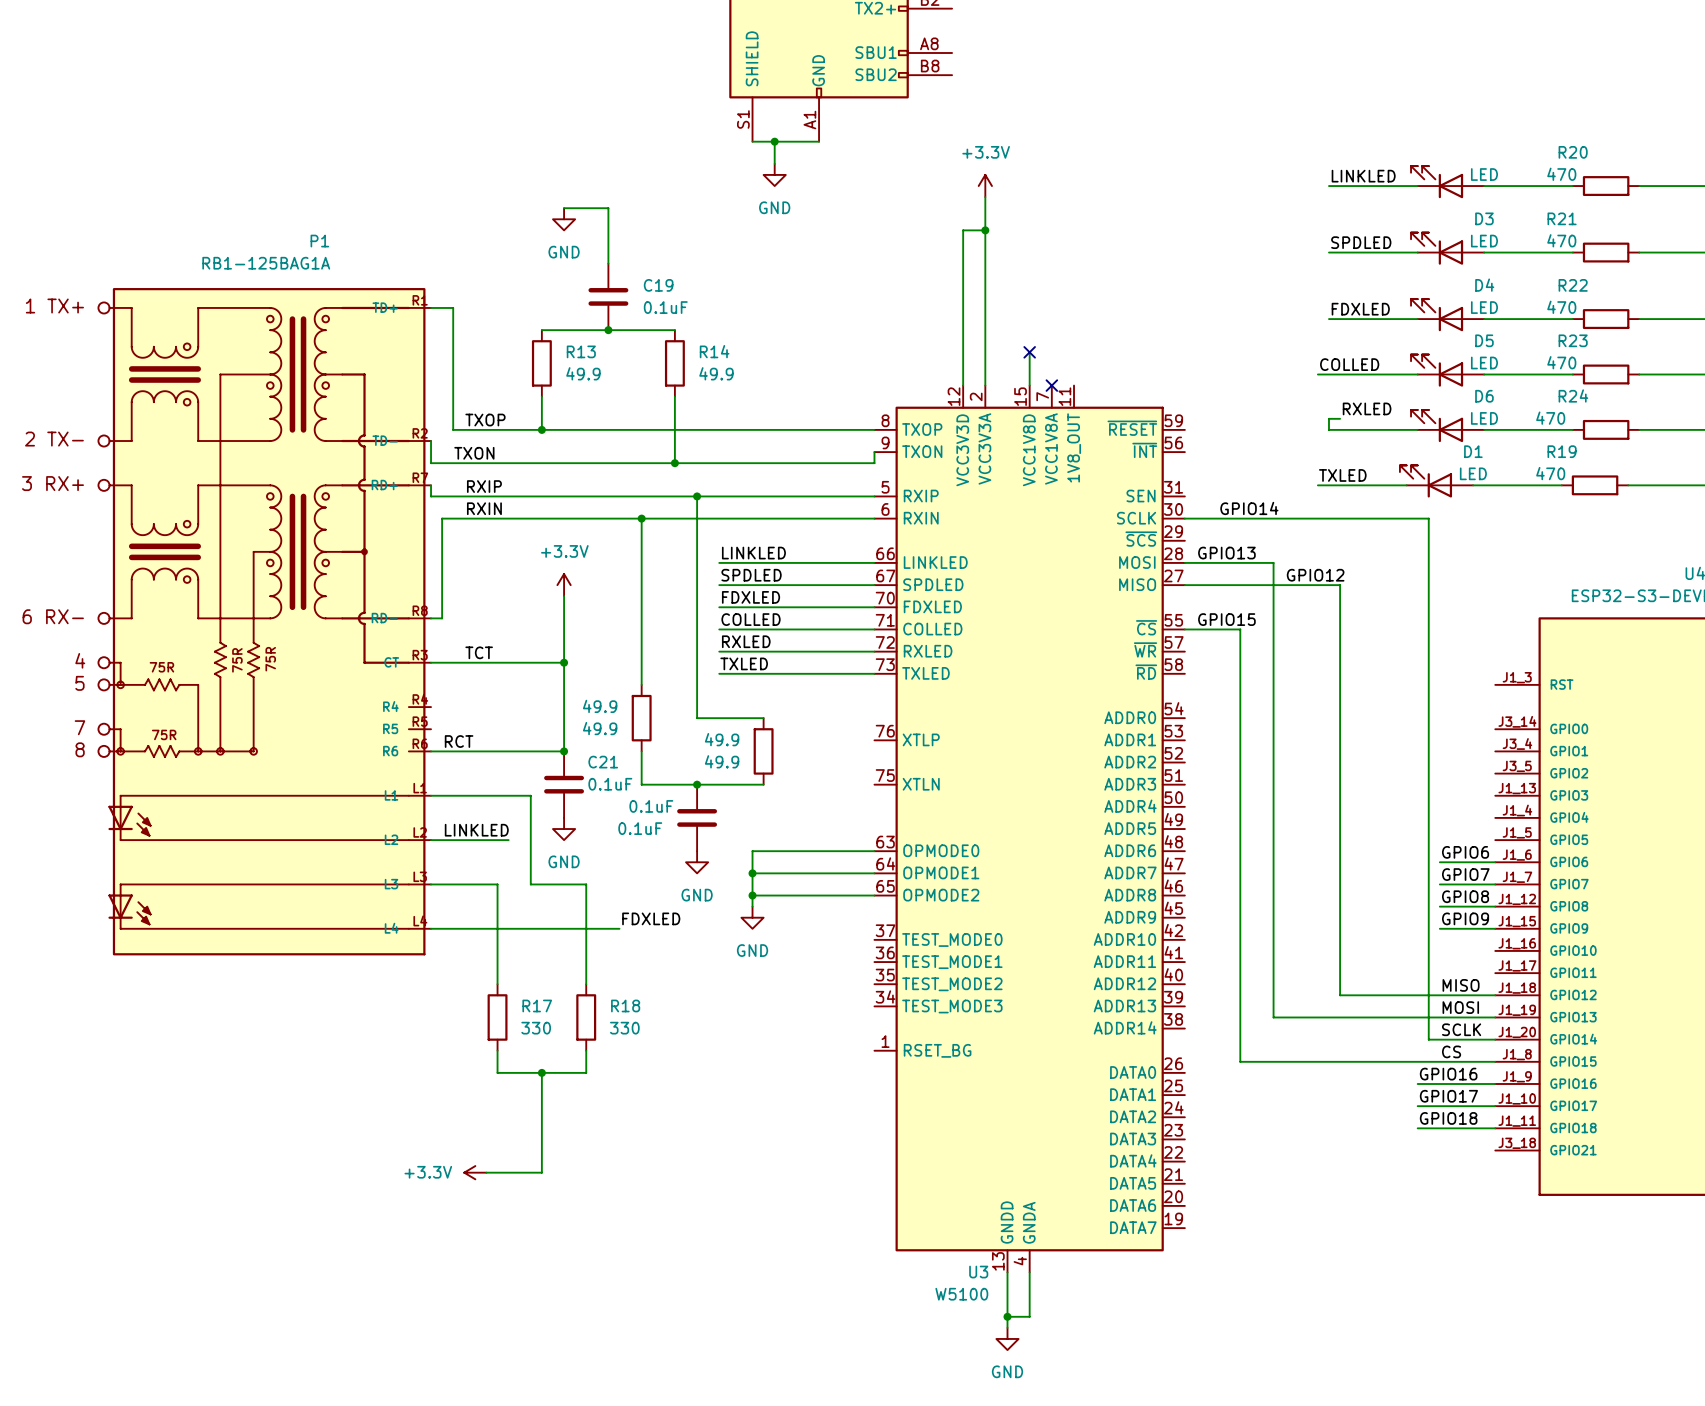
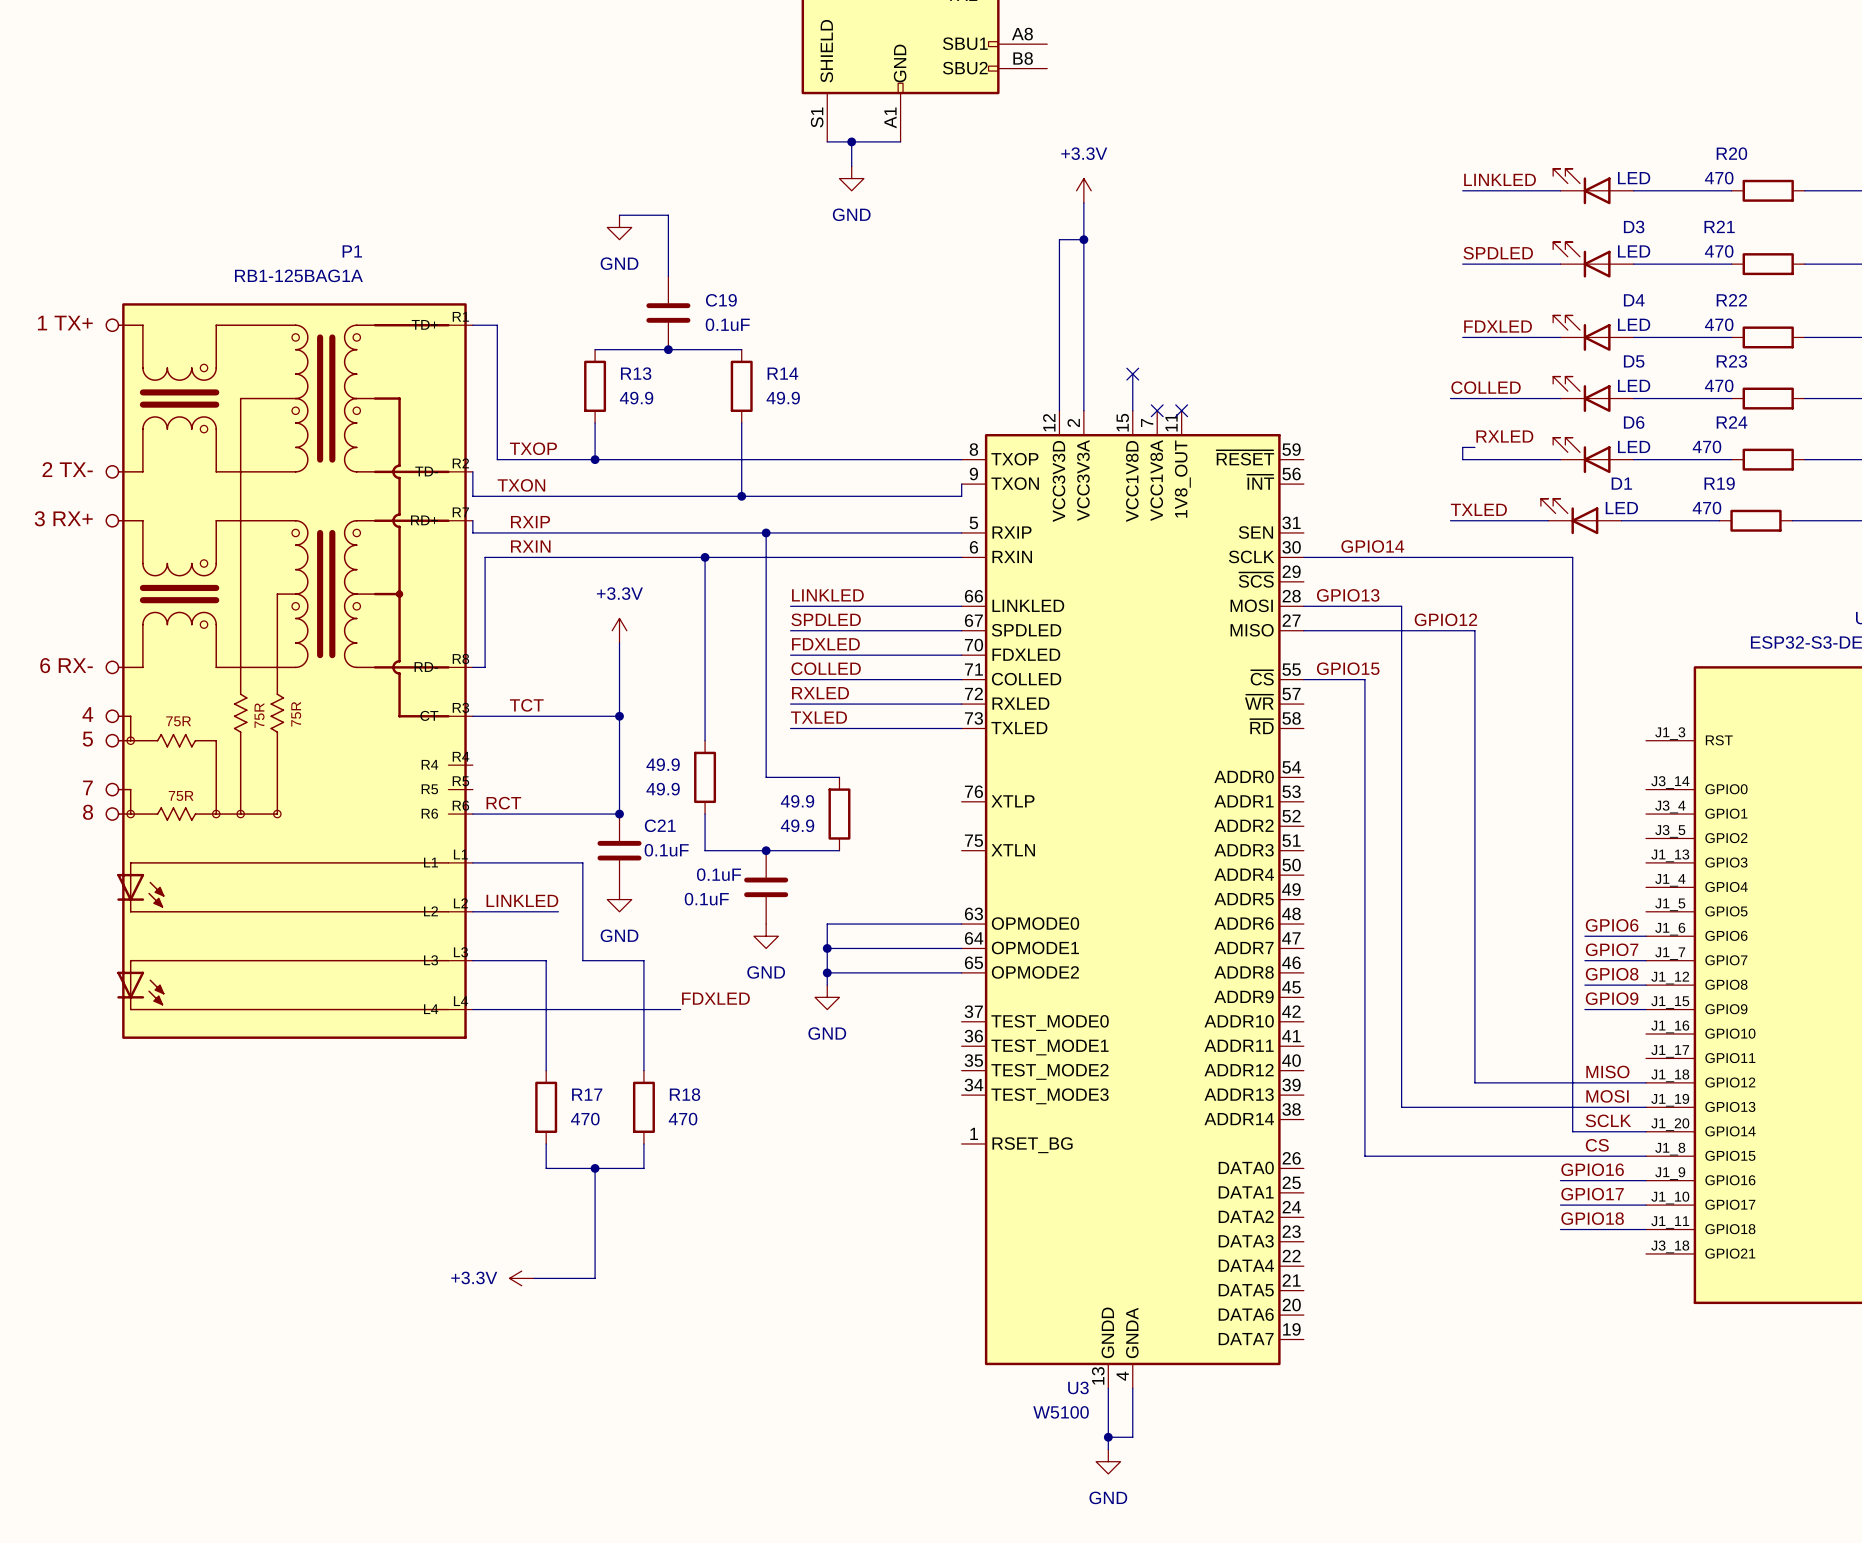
no-connect mark: none -> (1181, 410)
R17 value: 330 (536, 1028) -> 470 (585, 1119)
R18 value: 330 (624, 1028) -> 470 (683, 1119)

